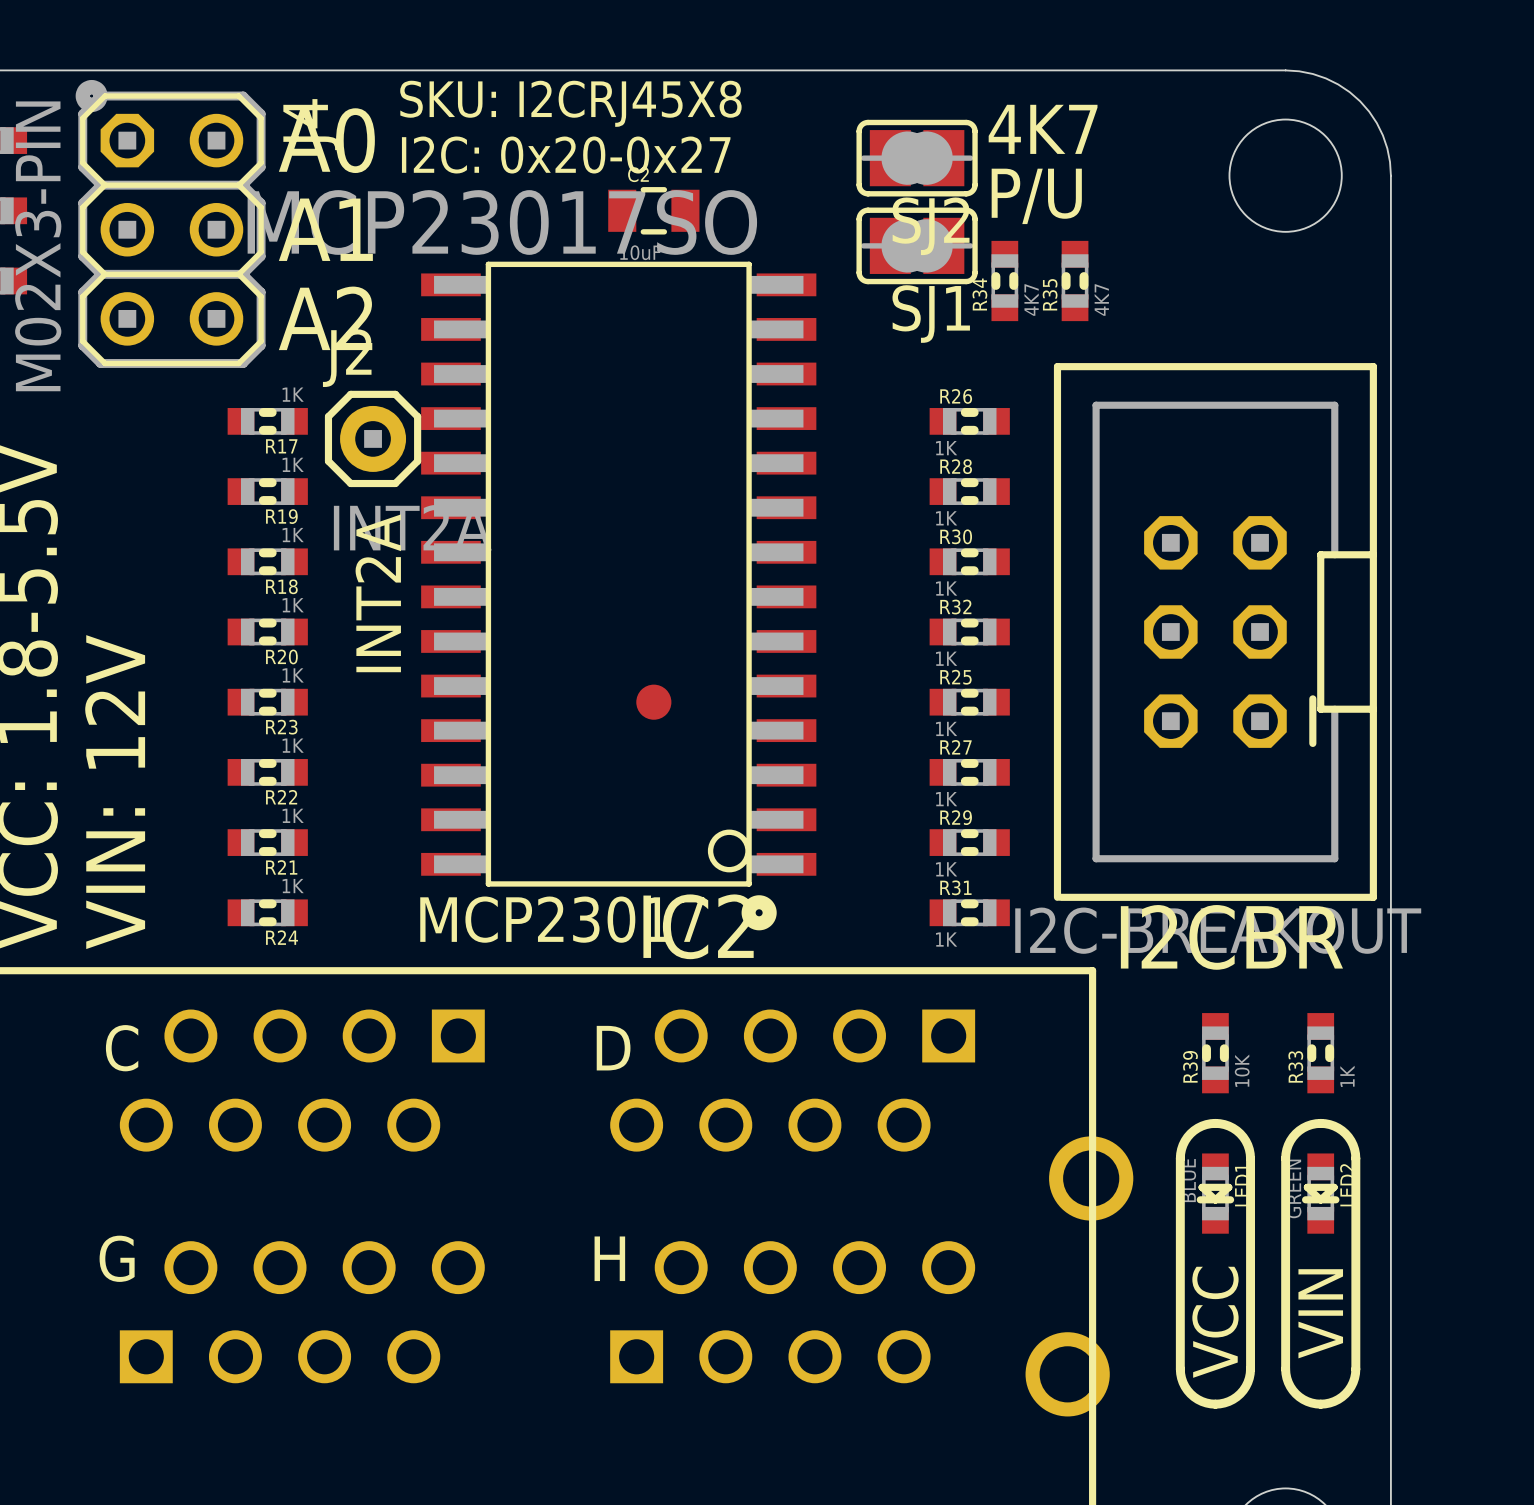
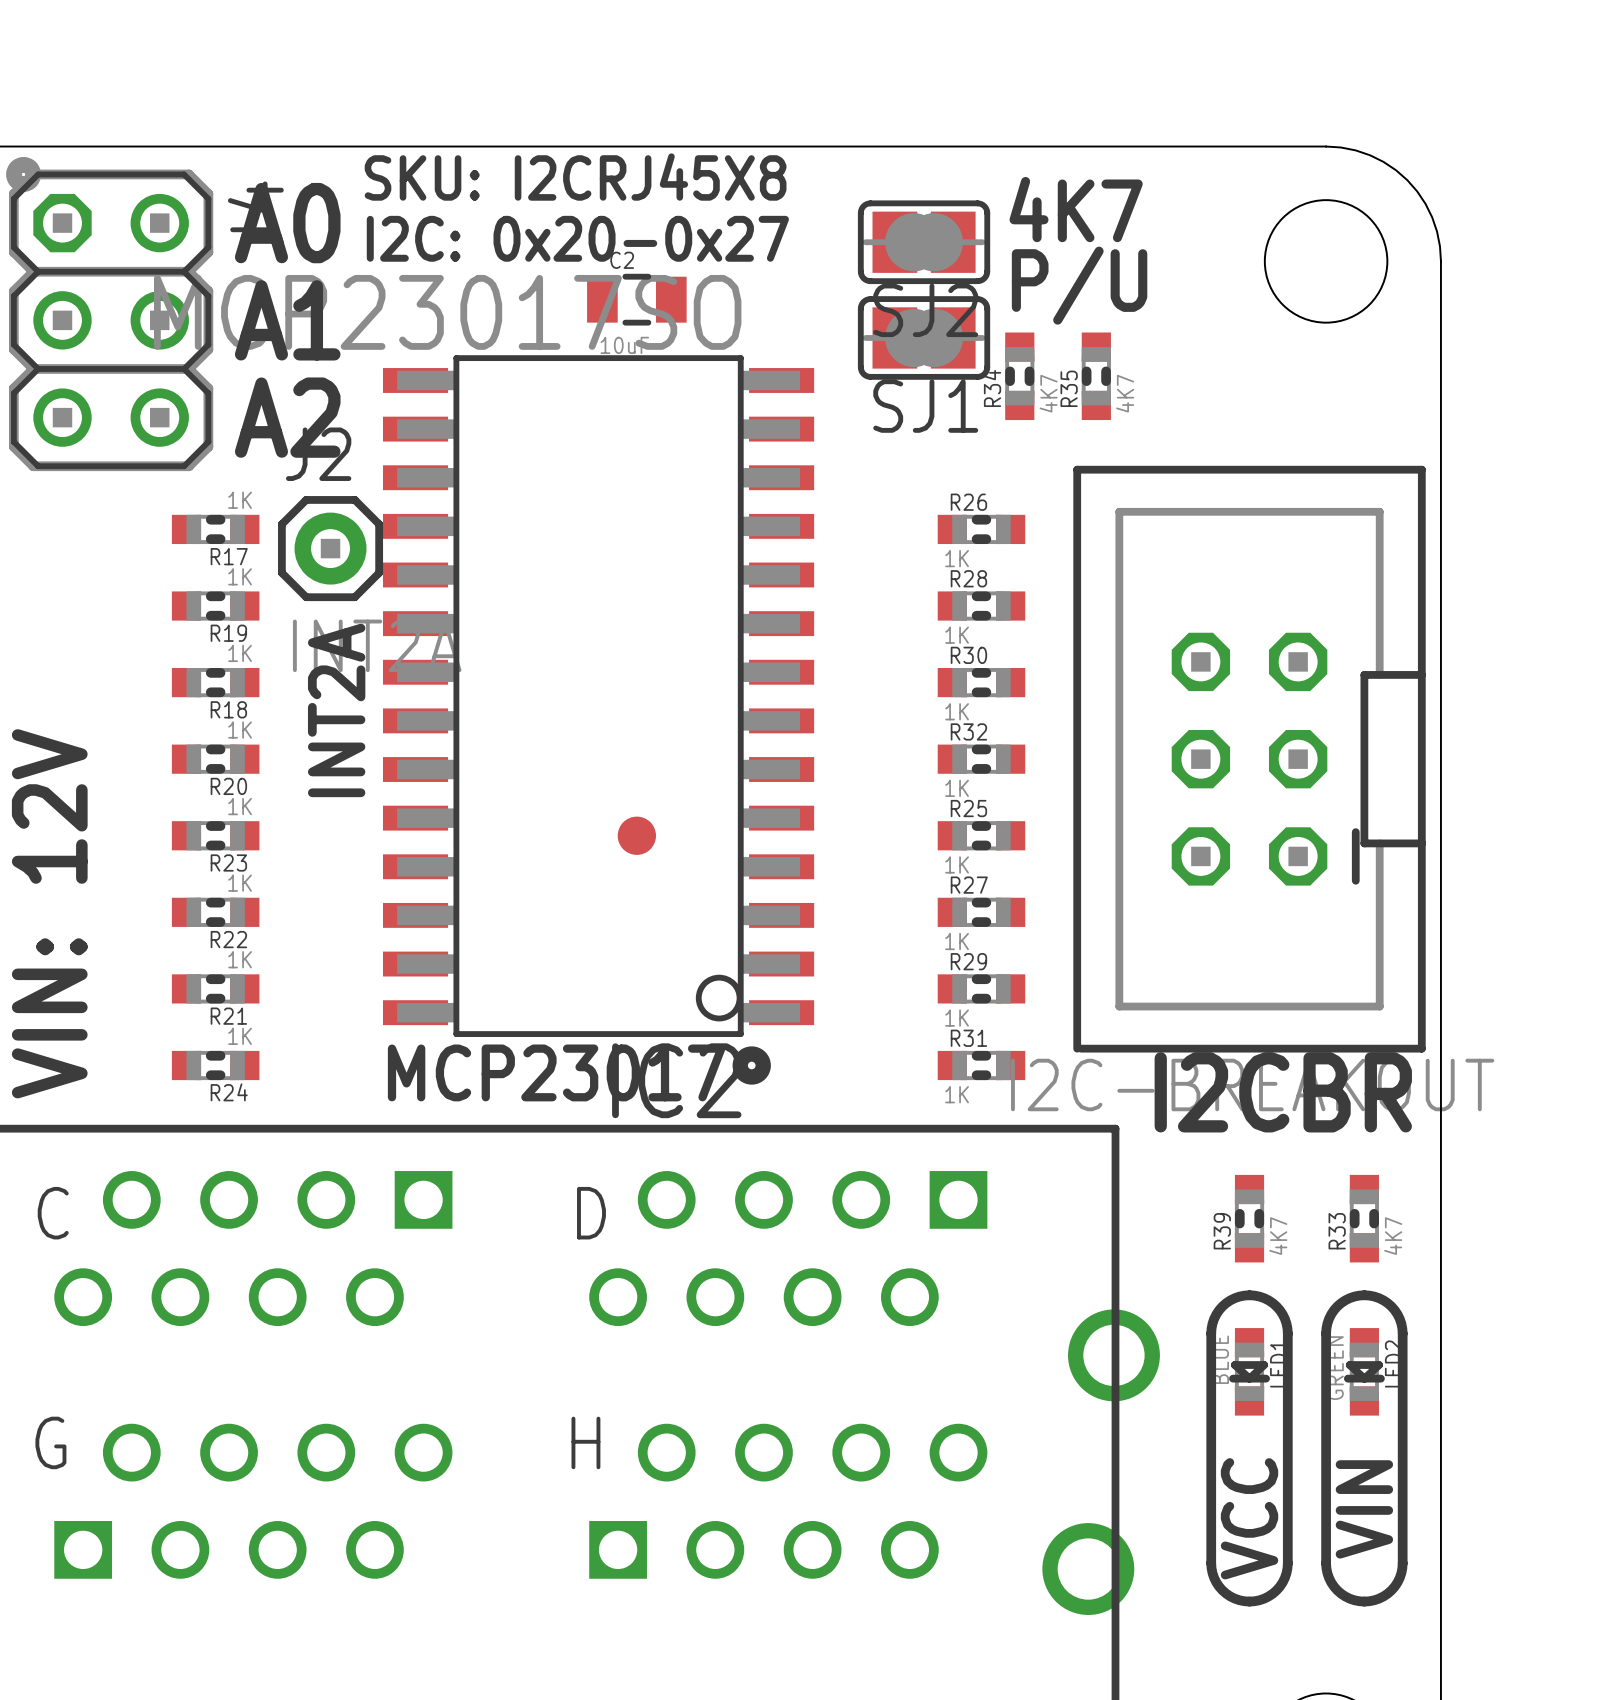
R39 value: 10K (1242, 1070) -> 4K7 (1278, 1236)
R33 value: 1K (1347, 1076) -> 4K7 (1393, 1236)

